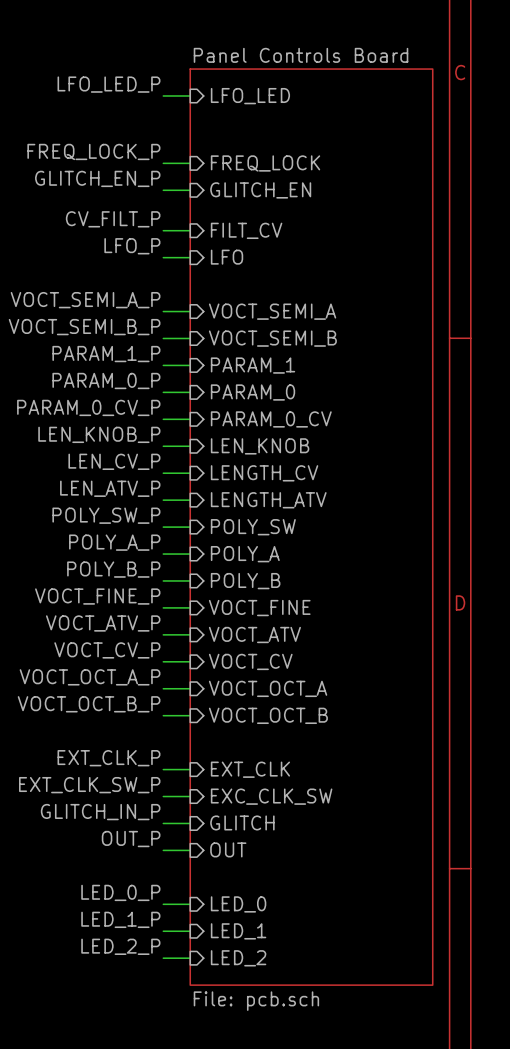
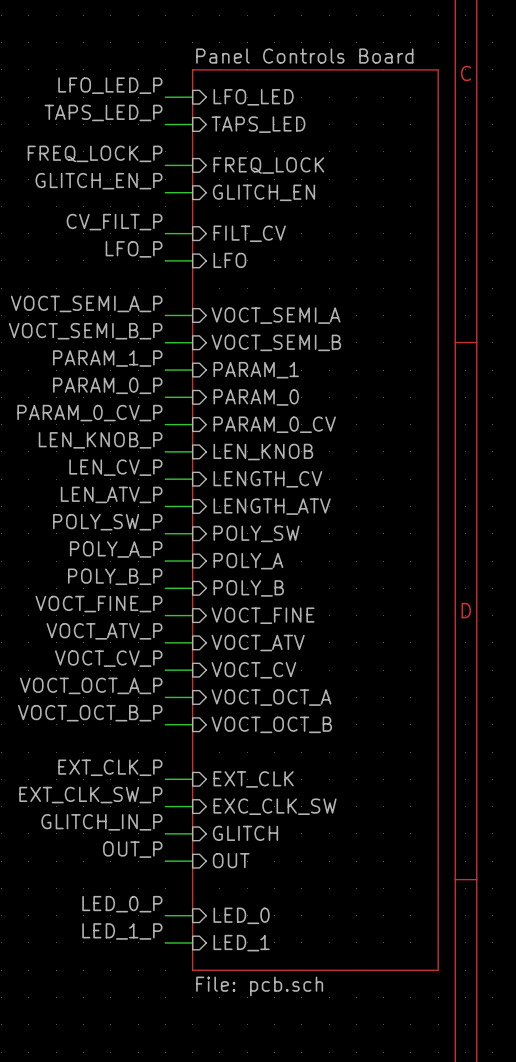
label: none -> TAPS_LED_P (103, 112)
wire: none -> (165, 124) (192, 124)
sheet pin: none -> TAPS_LED (258, 124)
sheet Panel Controls Board: none -> File: pcb.sch (315, 520)
sheet Panel Controls Board: File: pcb.sch (311, 527) -> none
label: LED_2_P (120, 946) -> none
wire: (163, 958) (190, 958) -> none
sheet pin: LED_2 (238, 958) -> none

